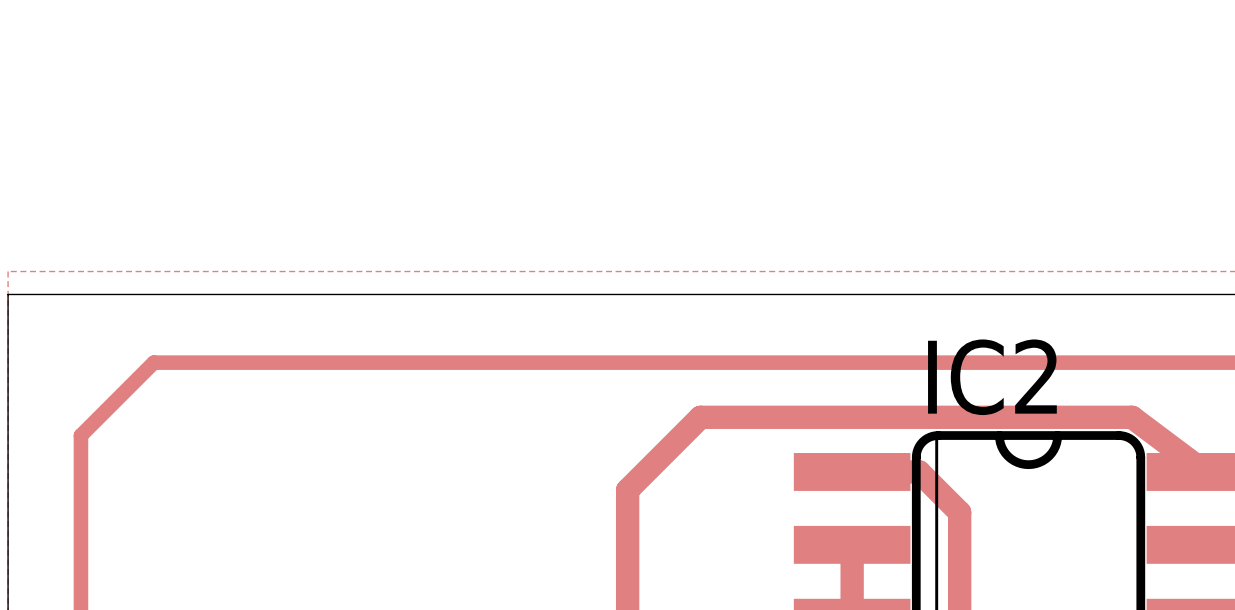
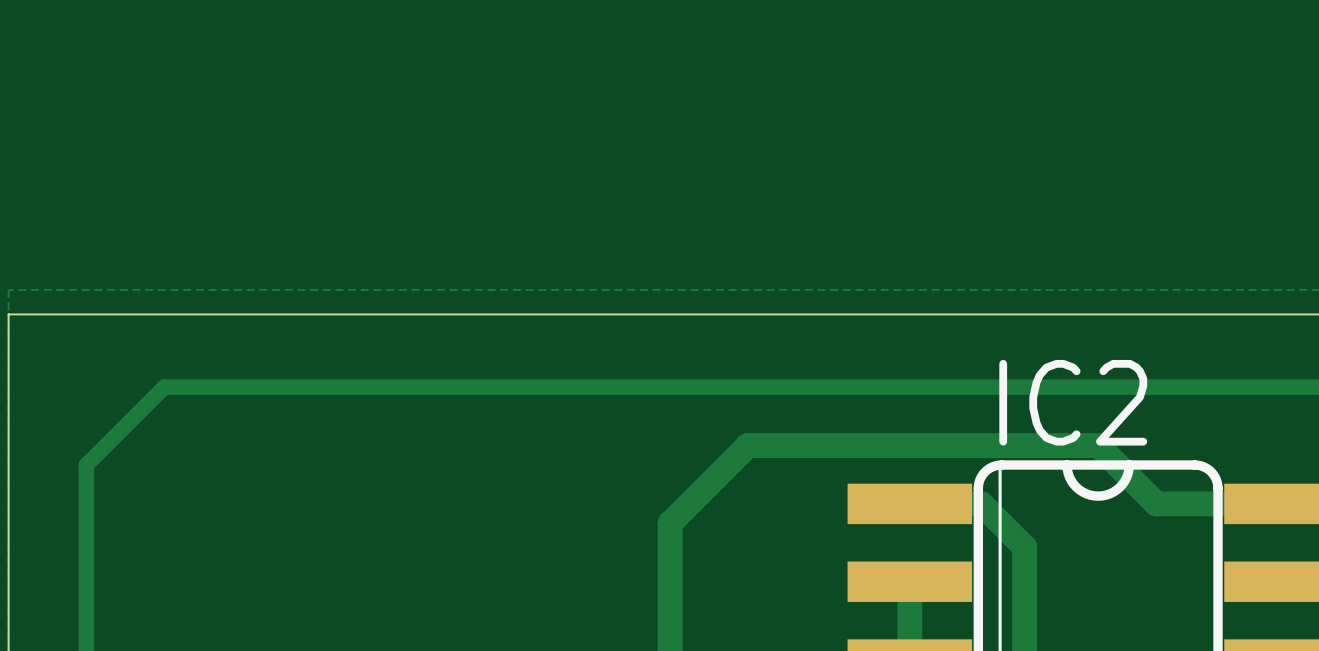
track: (1028, 417) (1132, 417) (1204, 471) -> (1098, 445) (1156, 503) (1286, 503)

